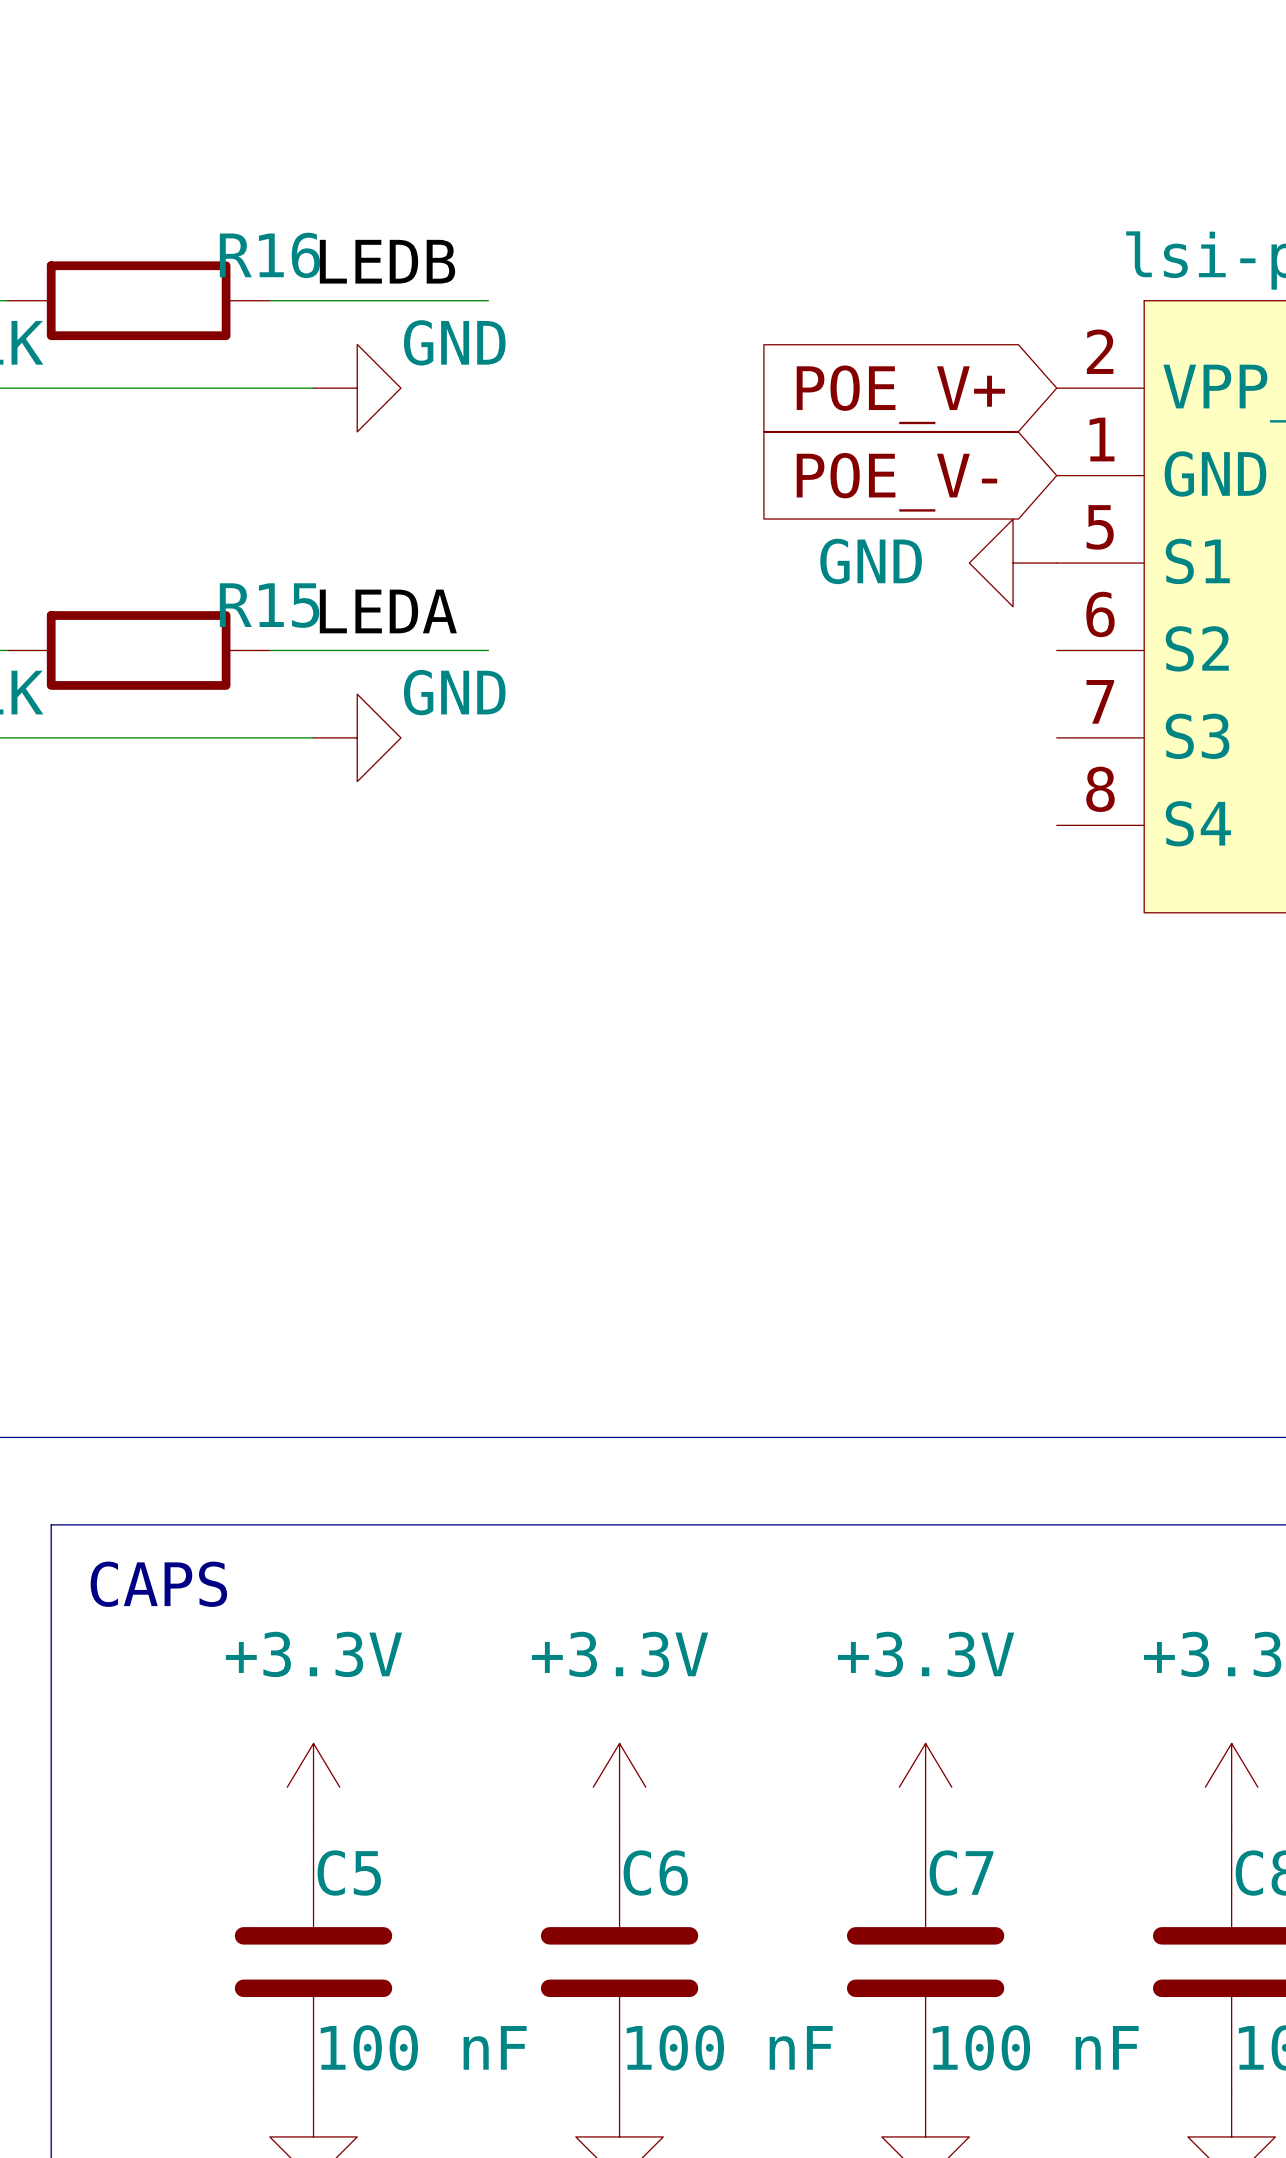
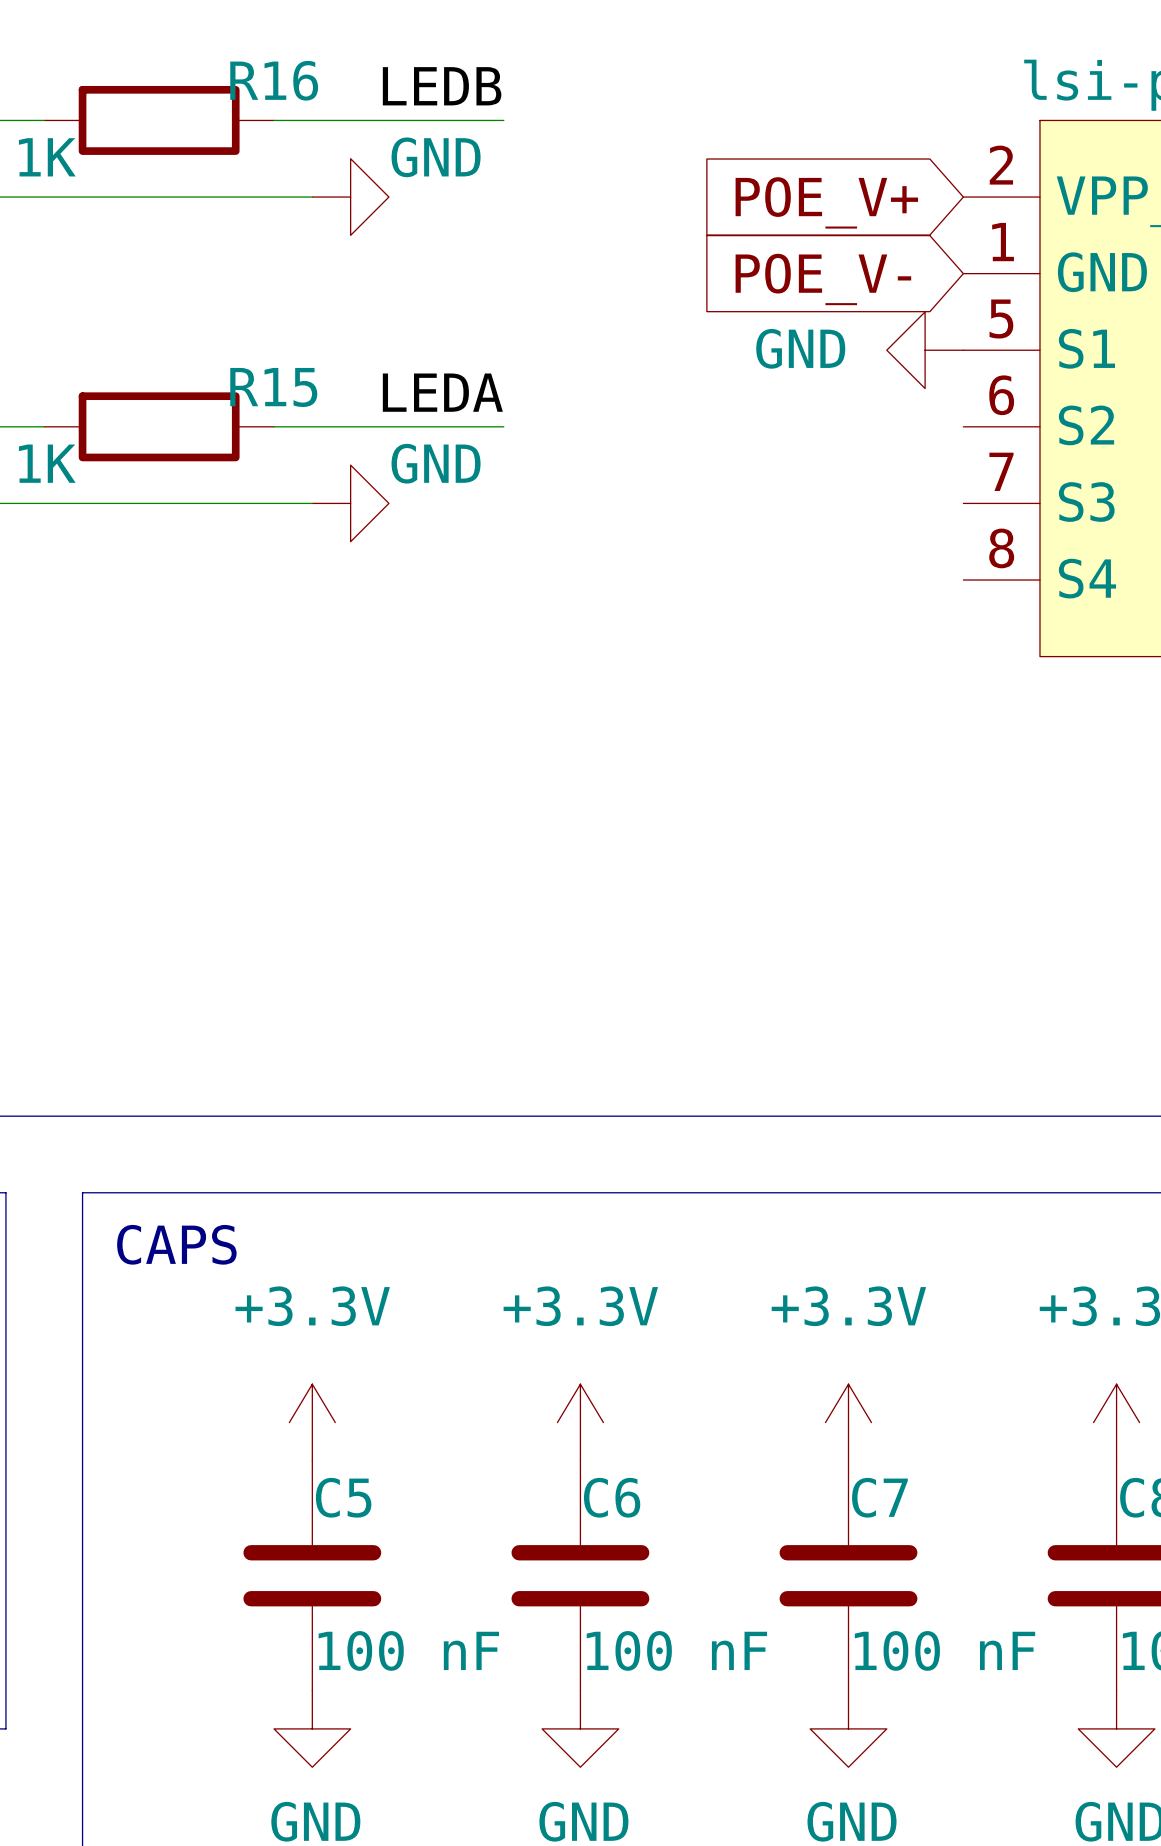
label position: LEDB (387, 261) -> LEDB (442, 86)
wire: none -> (465, 120) (503, 120)
label position: LEDA (388, 611) -> LEDA (442, 392)
wire: none -> (465, 426) (503, 426)

